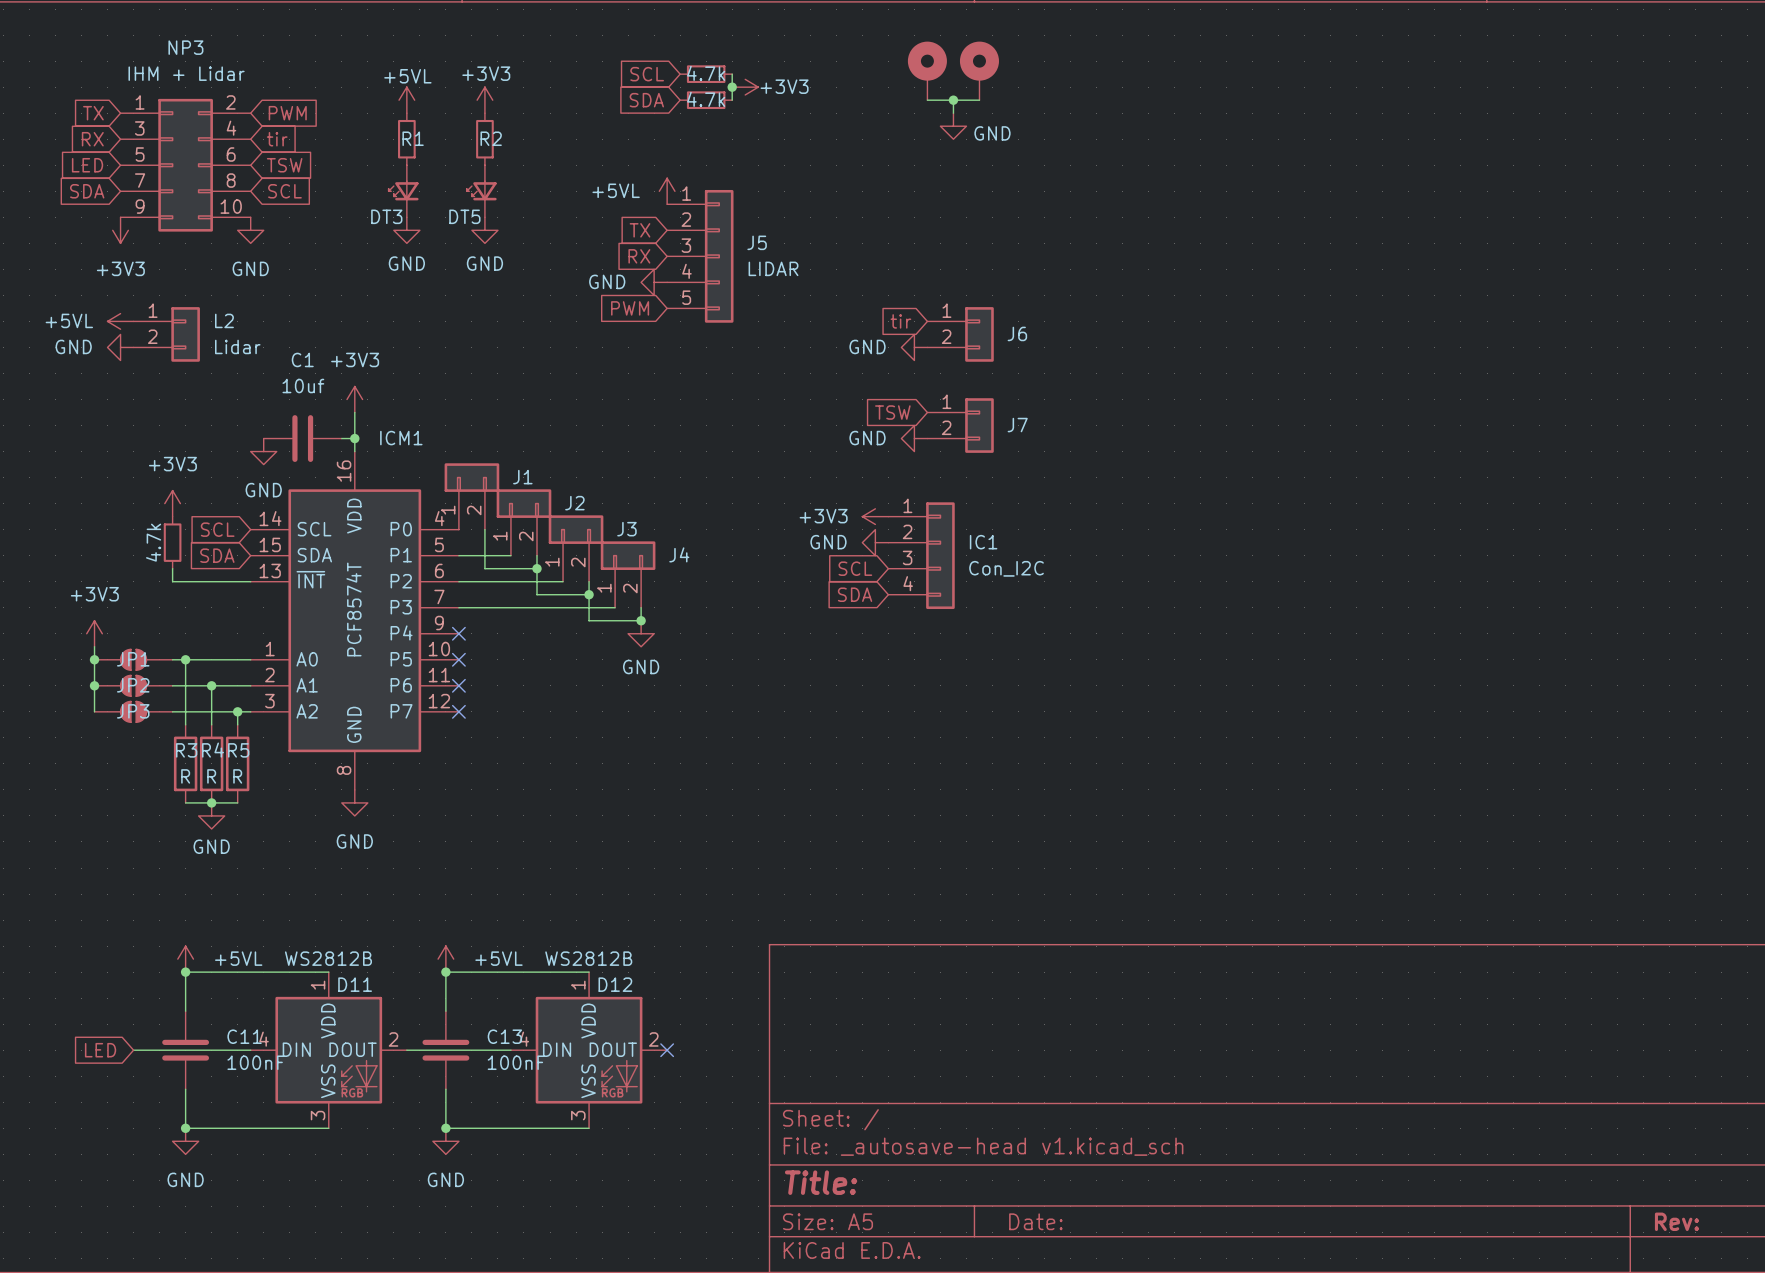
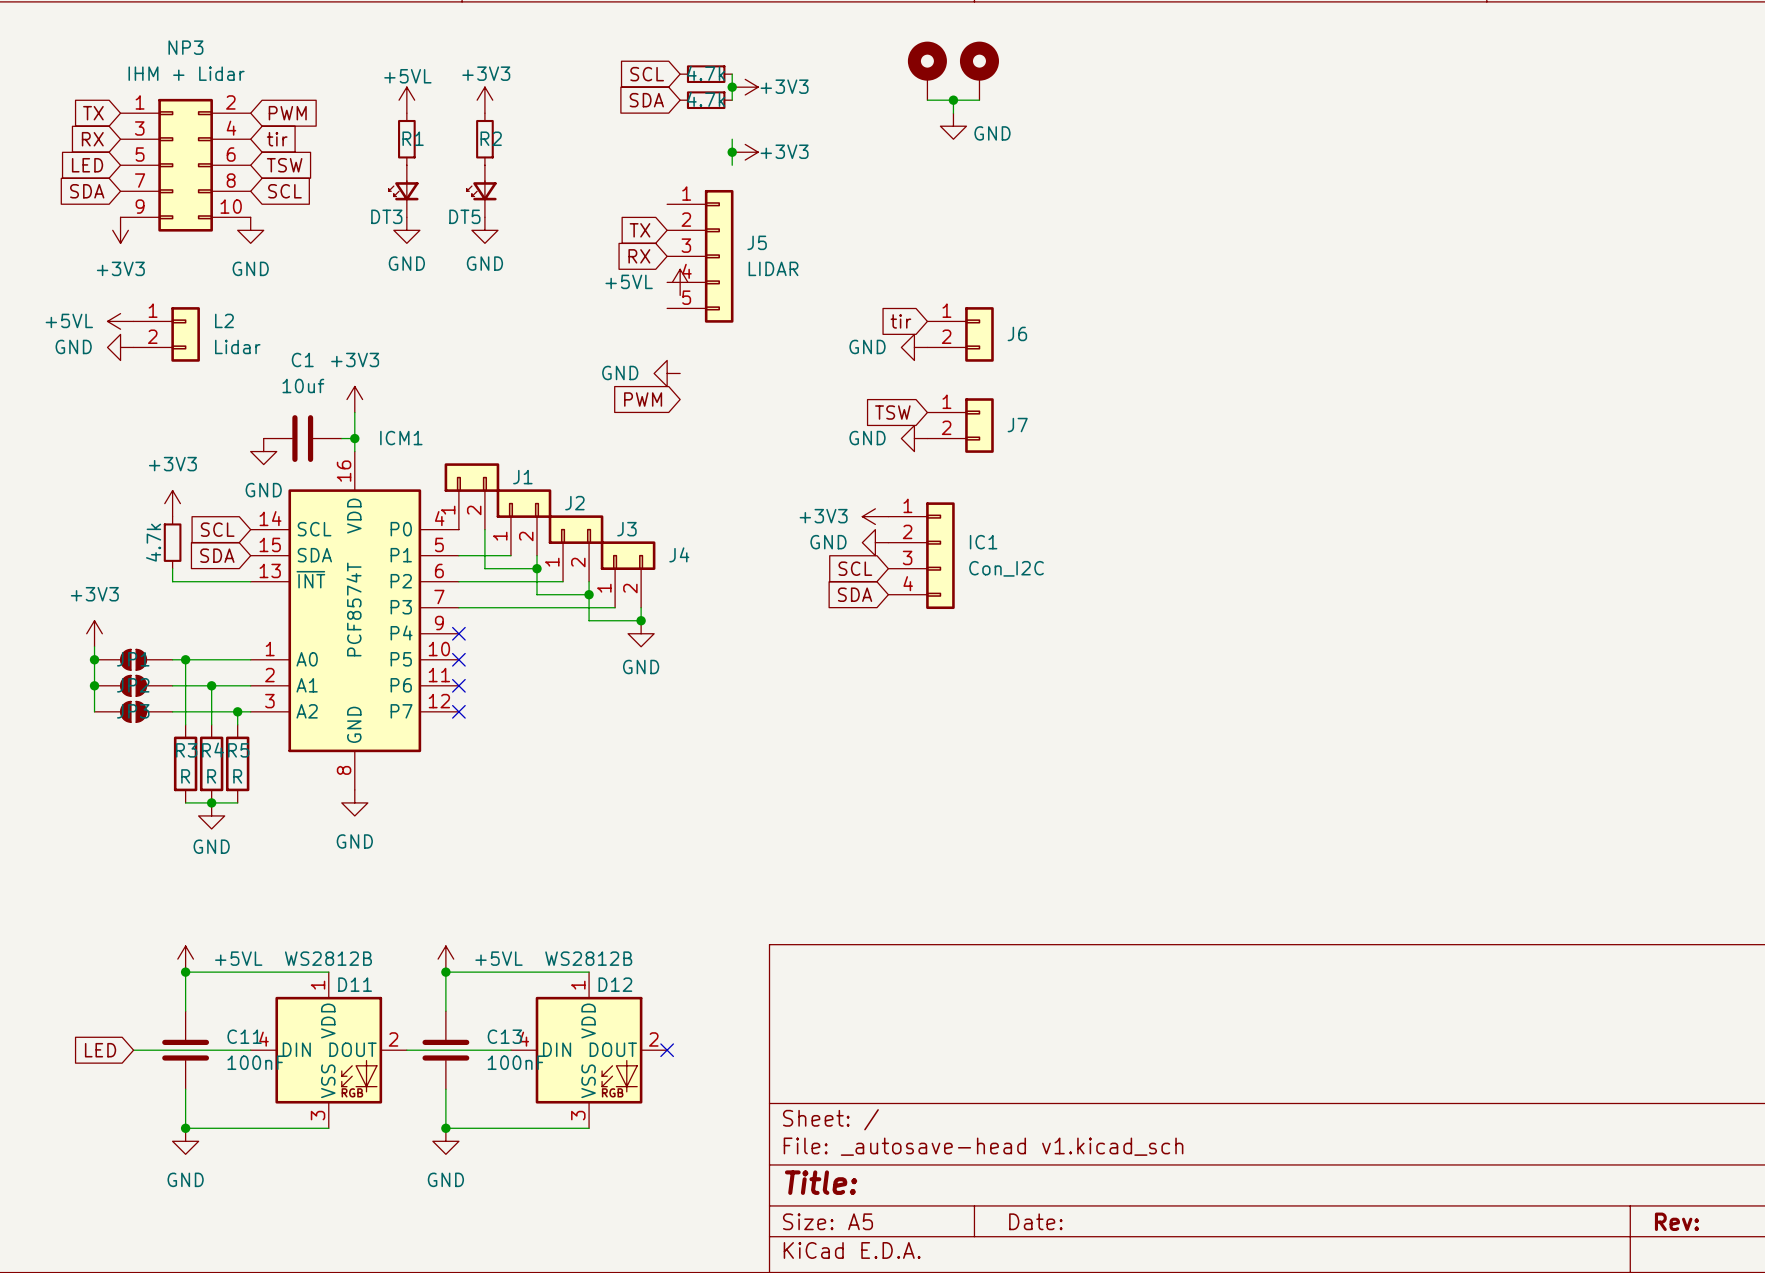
wire: none -> (732, 139) (732, 165)
junction: none -> (732, 152)
power symbol: none -> +3V3 (745, 152)
power symbol position: +5VL (667, 191) -> +5VL (680, 282)
power symbol position: GND (654, 282) -> GND (667, 373)
global label position: PWM (630, 308) -> PWM (643, 399)

